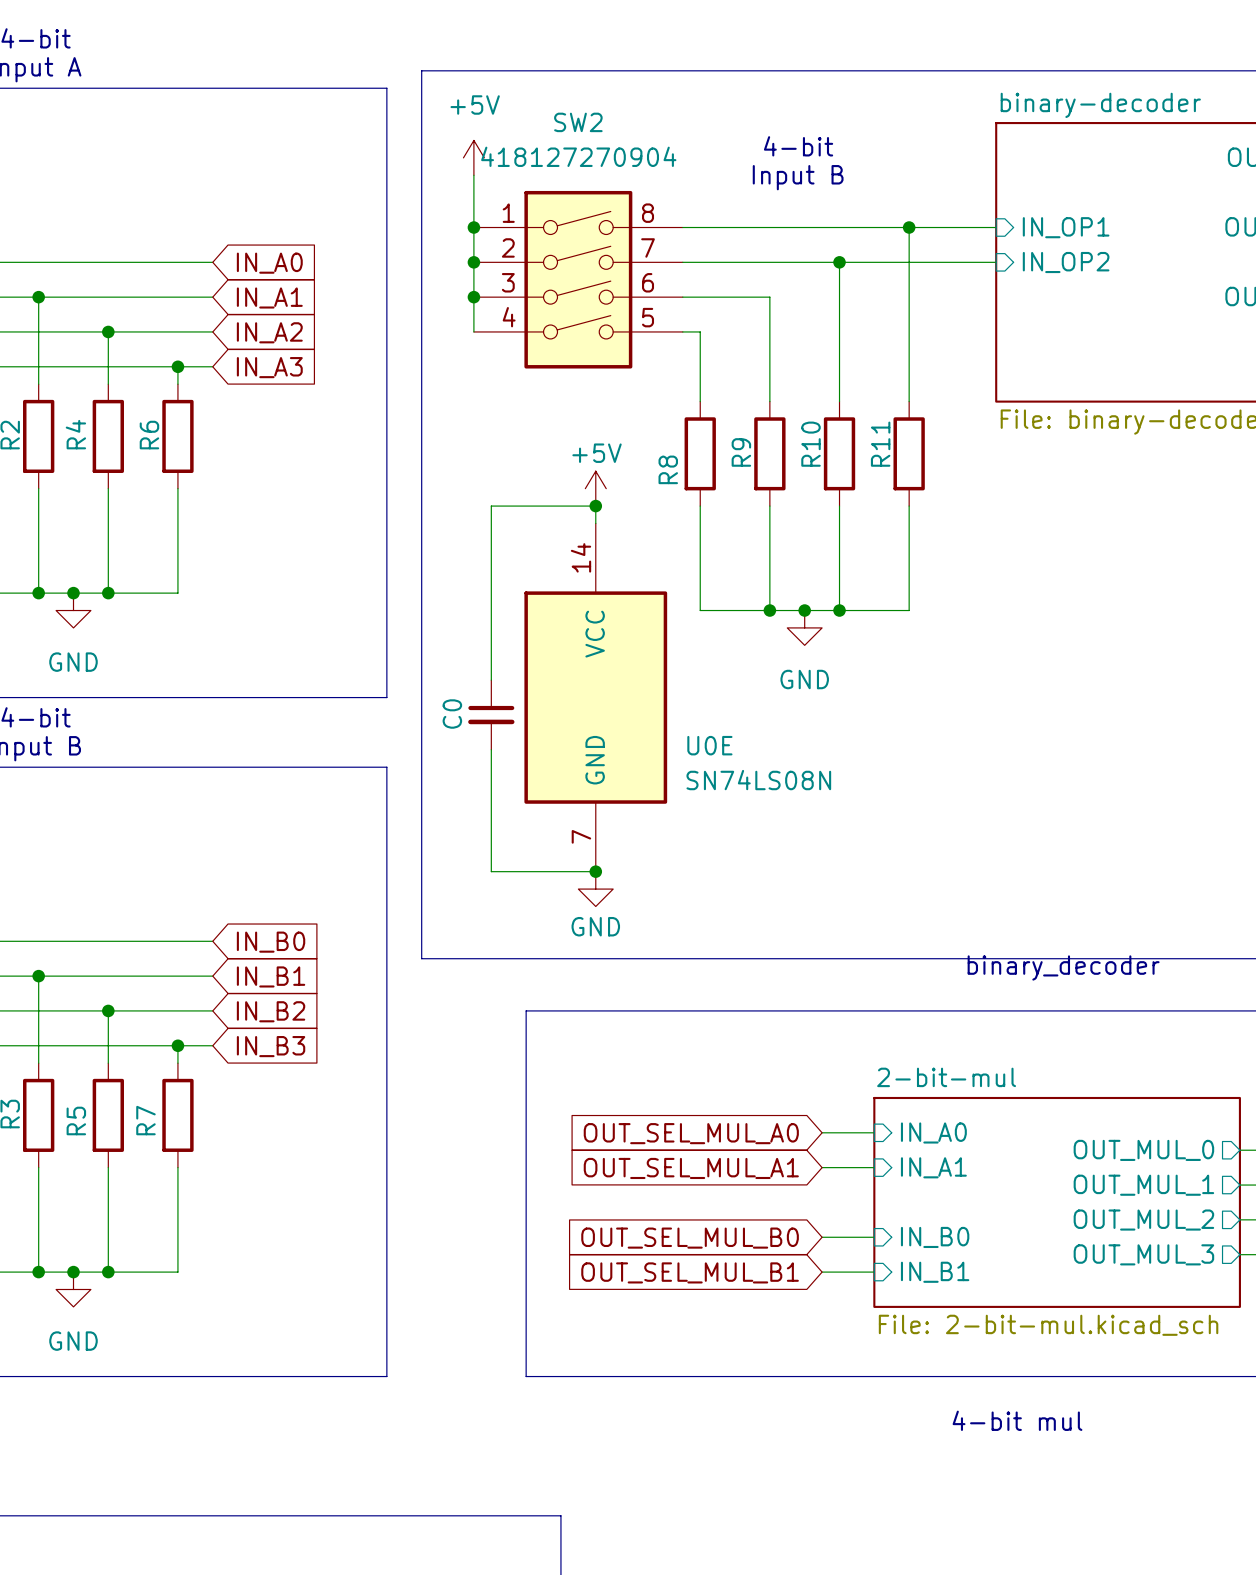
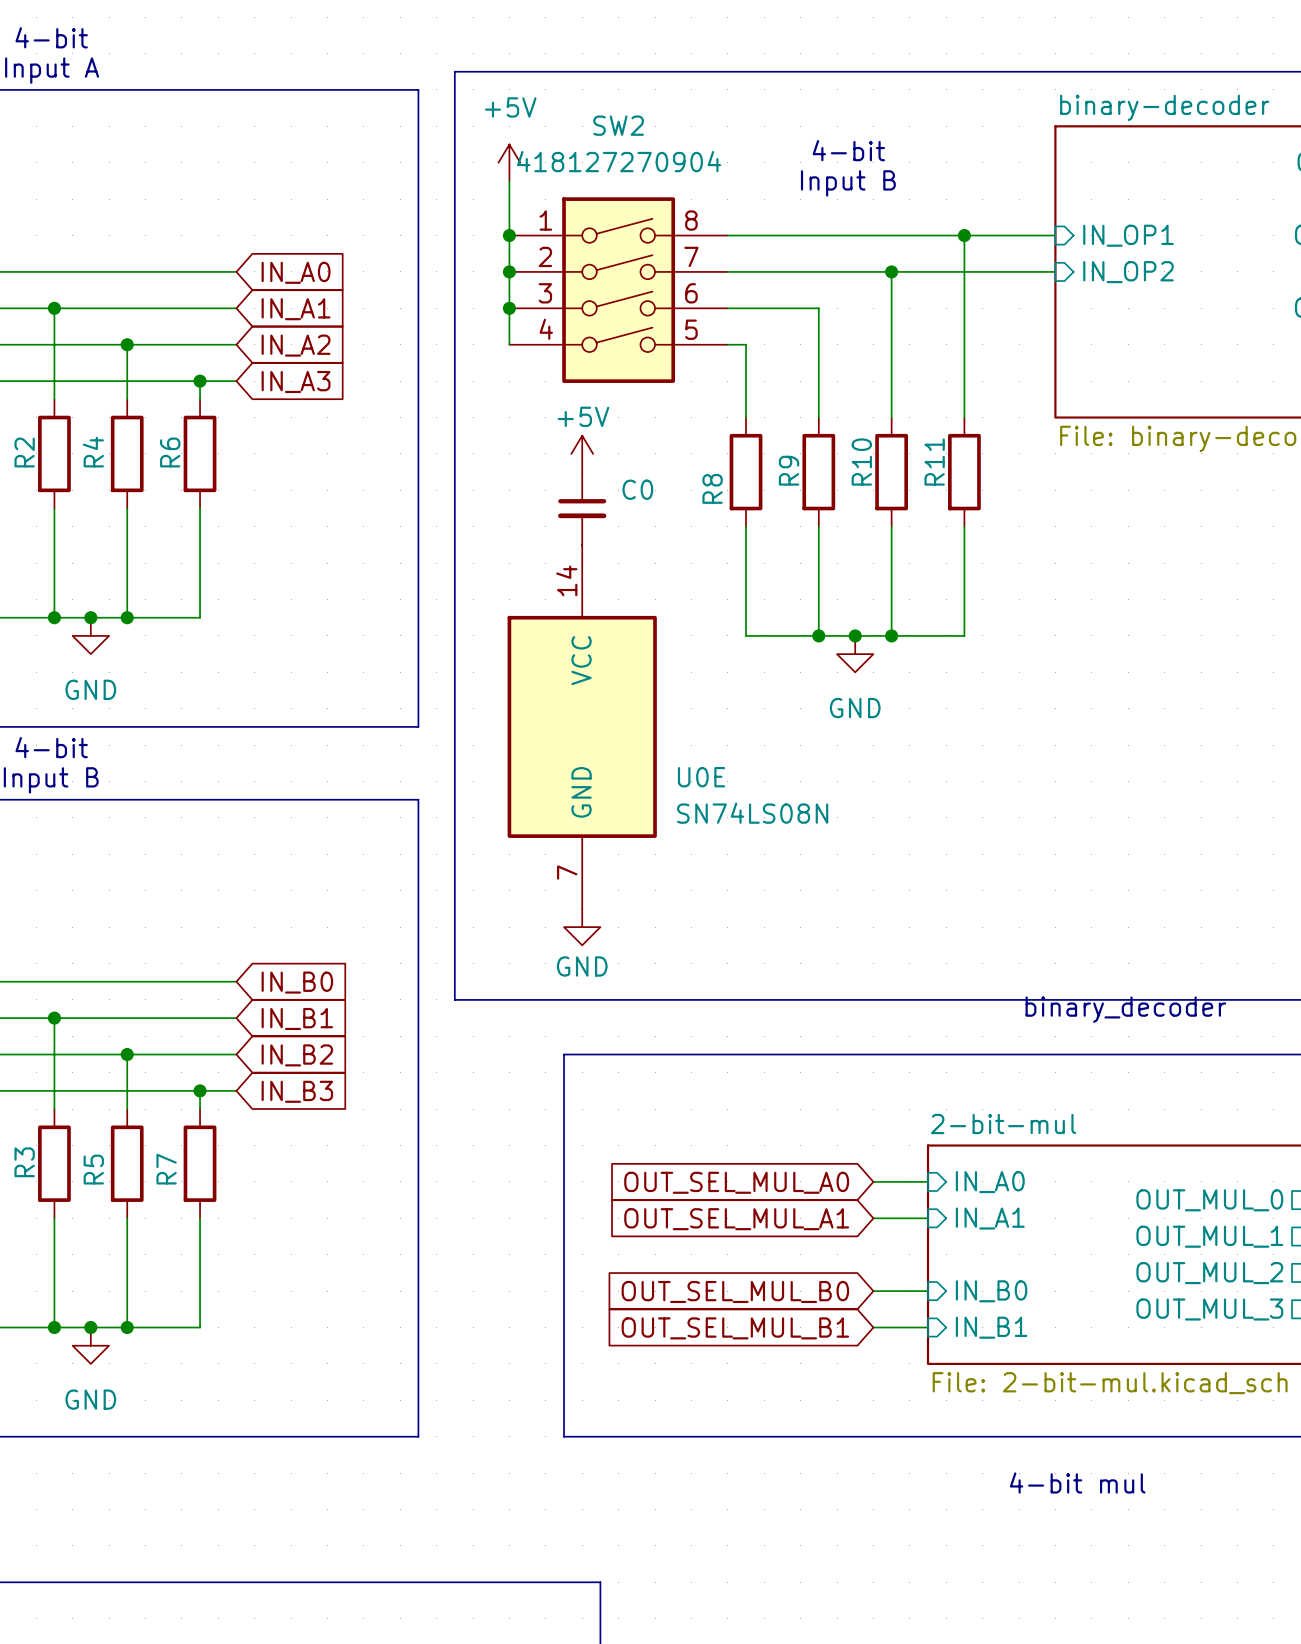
power symbol position: +5V (595, 488) -> +5V (582, 453)
junction: (595, 506) -> none
wire: (595, 523) (595, 506) (491, 506) (491, 680) -> none
U0E position: (595, 697) -> (582, 726)
C0 name rotation: 0° (452, 714) -> 90° clockwise (637, 489)
C0 name position: C0 (452, 714) -> C0 (637, 489)
C0 position: (491, 714) -> (582, 508)
wire: (491, 749) (491, 871) (595, 871) -> none
junction: (595, 871) -> none
power symbol position: GND (595, 889) -> GND (582, 927)

